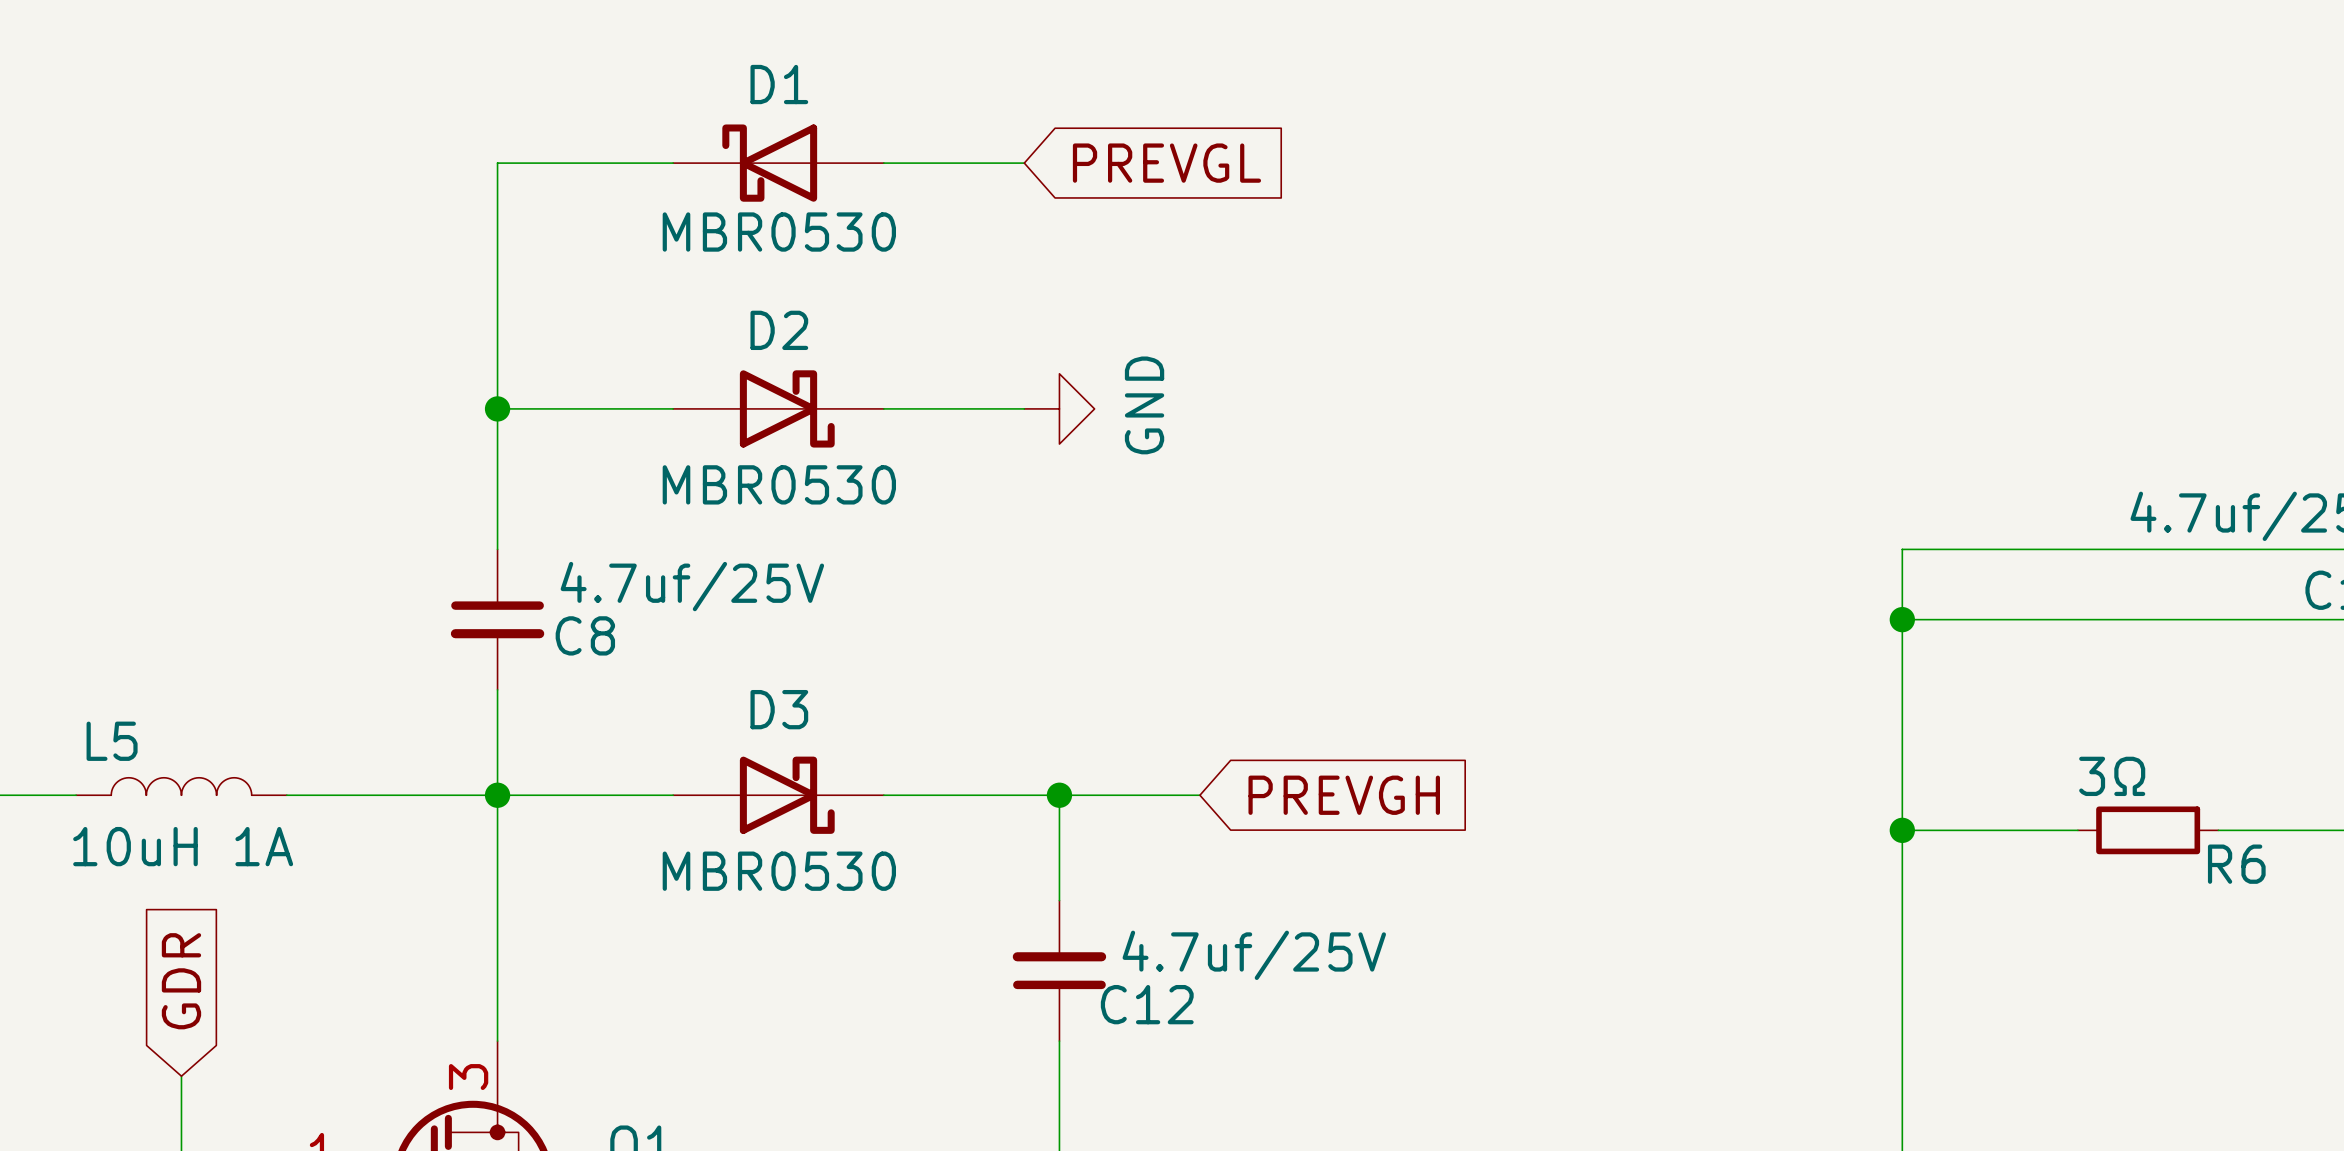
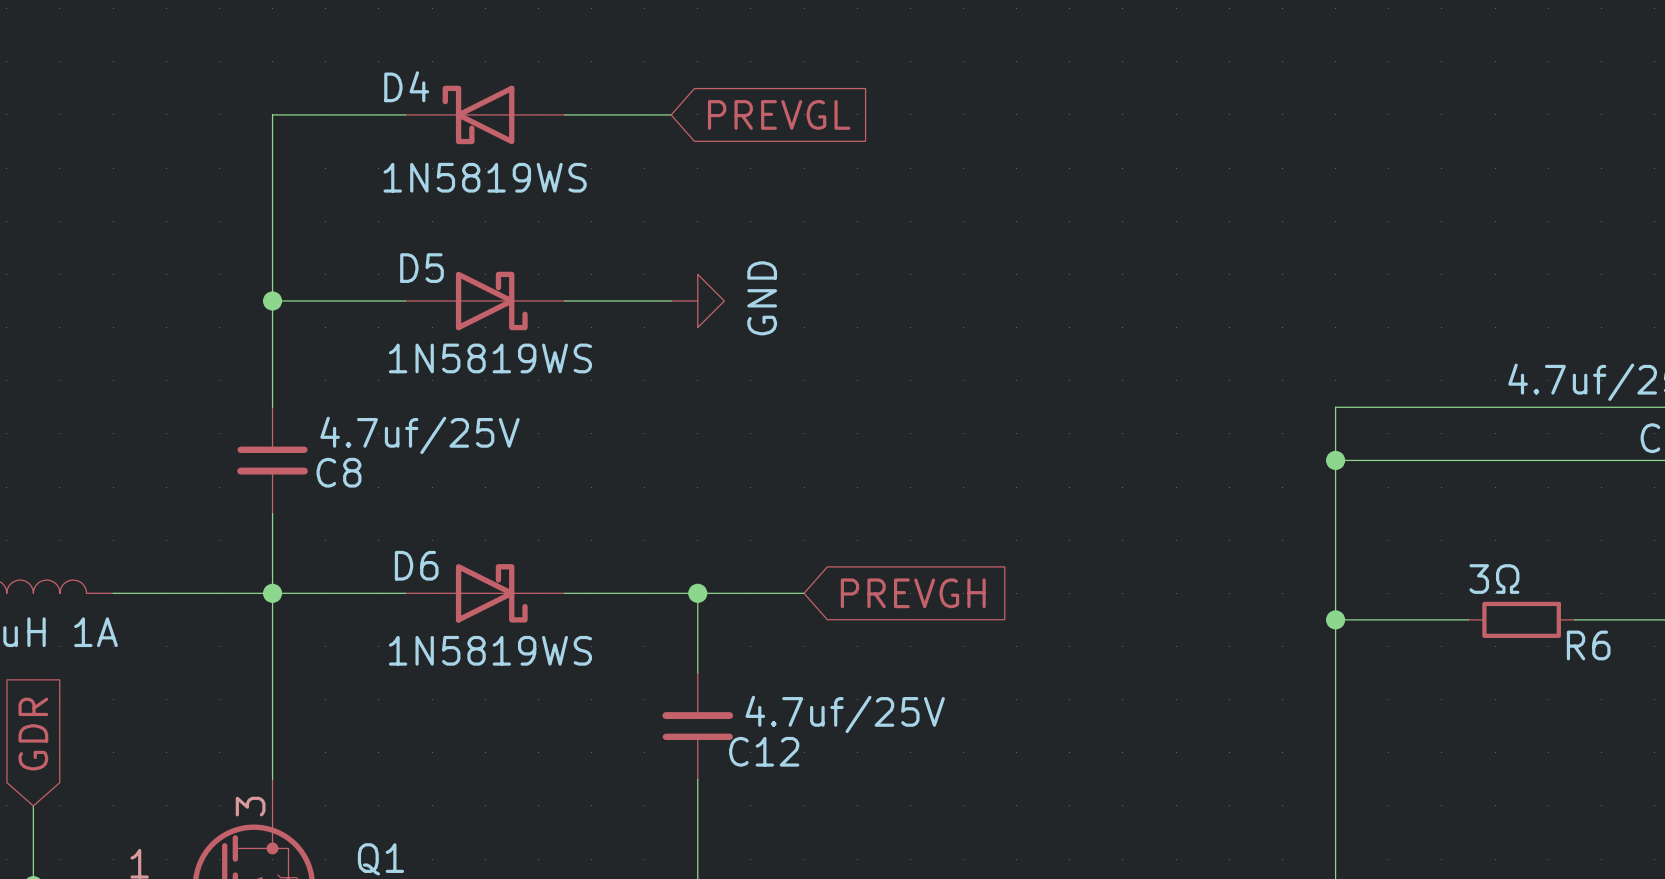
D1 name: D1 (779, 84) -> D4 (406, 86)
D1 value: MBR0530 (779, 232) -> 1N5819WS (485, 177)
D2 name: D2 (779, 330) -> D5 (422, 268)
D2 value: MBR0530 (779, 484) -> 1N5819WS (490, 358)
D3 name: D3 (779, 709) -> D6 (416, 565)
D3 value: MBR0530 (779, 871) -> 1N5819WS (490, 650)

